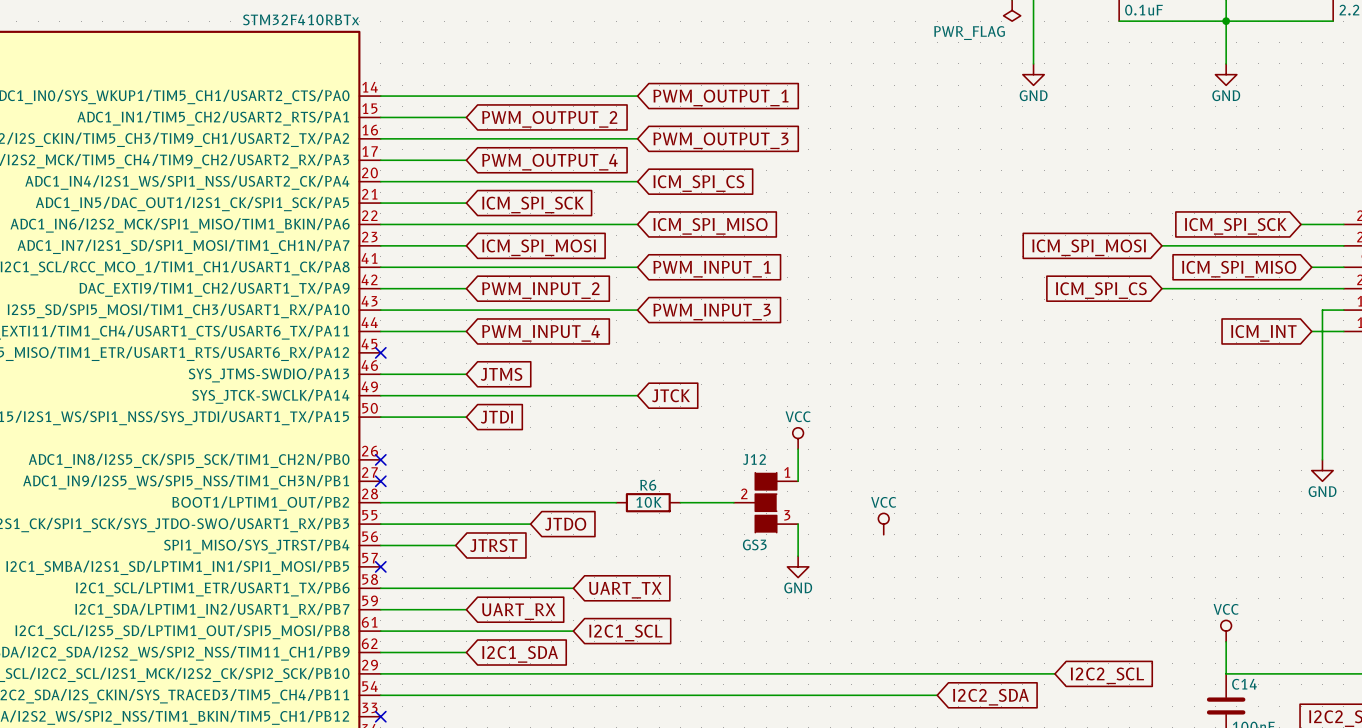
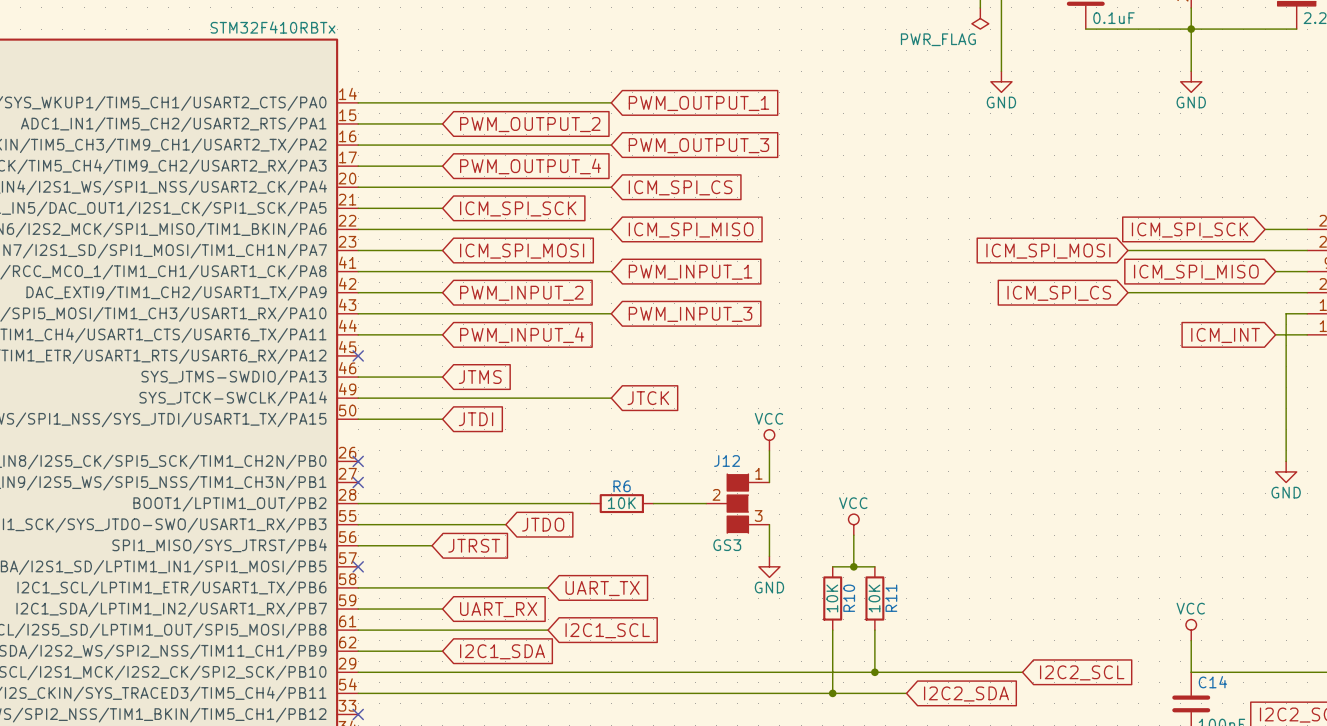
wire: none -> (853, 535) (853, 566)
wire: none -> (832, 566) (874, 566)
junction: none -> (853, 566)
R10: none -> 10K (832, 598)
R11: none -> 10K (874, 598)
wire: none -> (832, 630) (832, 693)
wire: none -> (874, 630) (874, 672)
junction: none -> (874, 672)
junction: none -> (832, 693)

